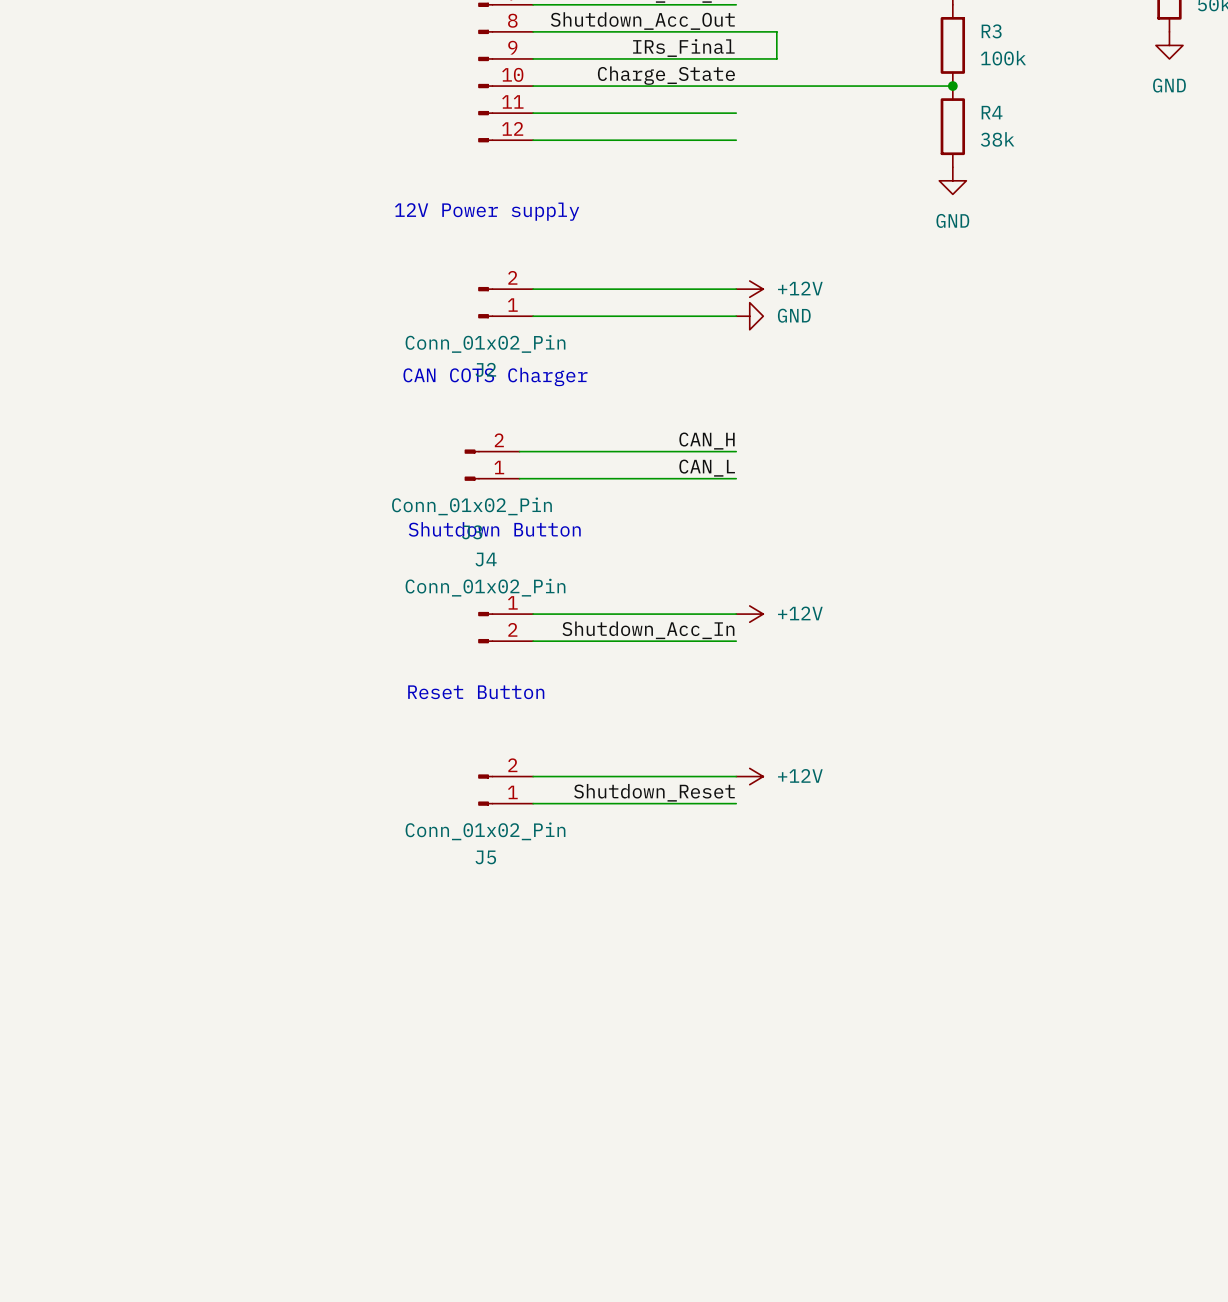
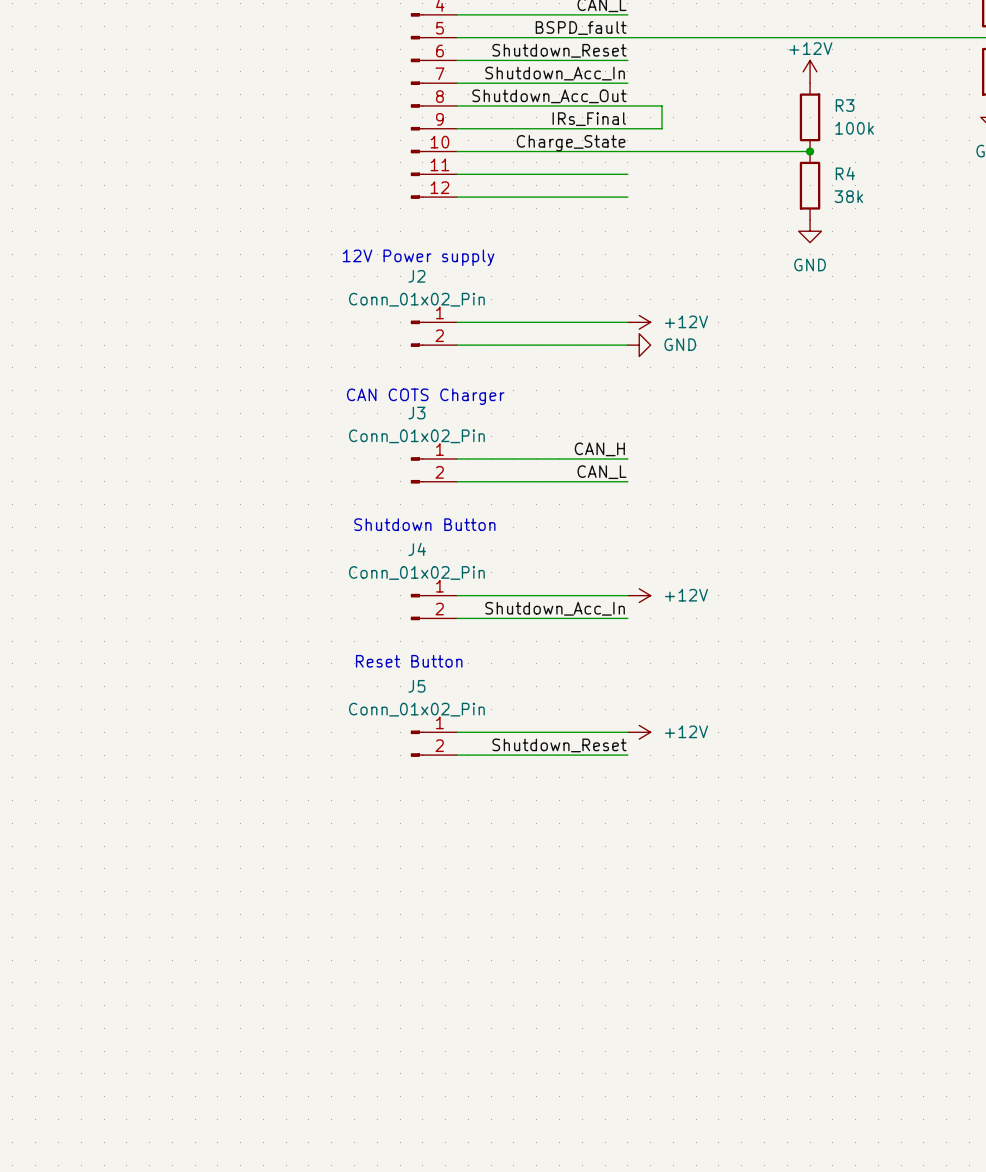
J2 flip: as is (485, 302) -> up-down (417, 333)
J3 flip: as is (472, 465) -> up-down (417, 470)
J5 flip: as is (485, 790) -> up-down (417, 743)

